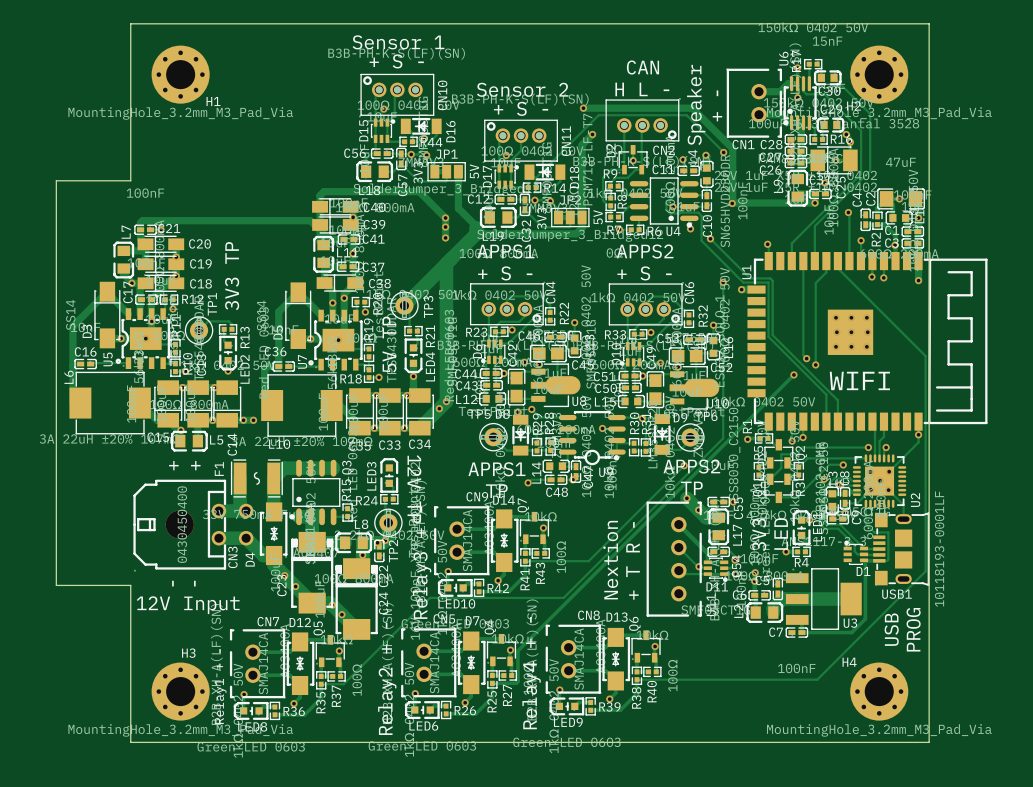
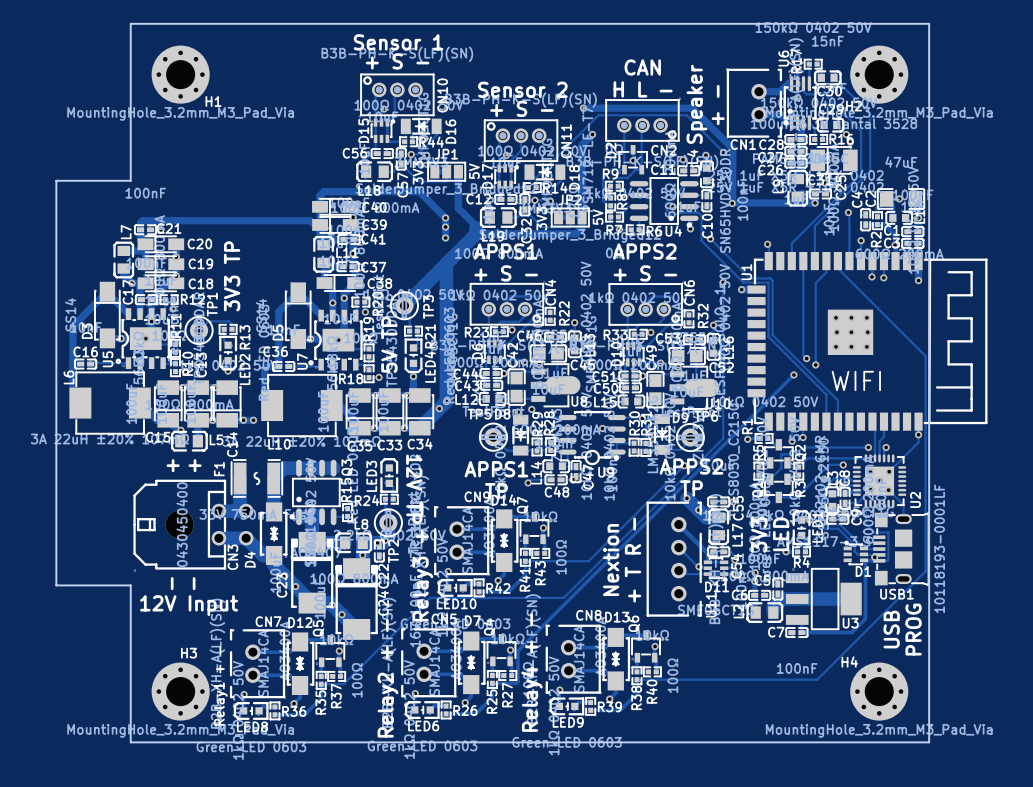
via: none -> (874, 557)

